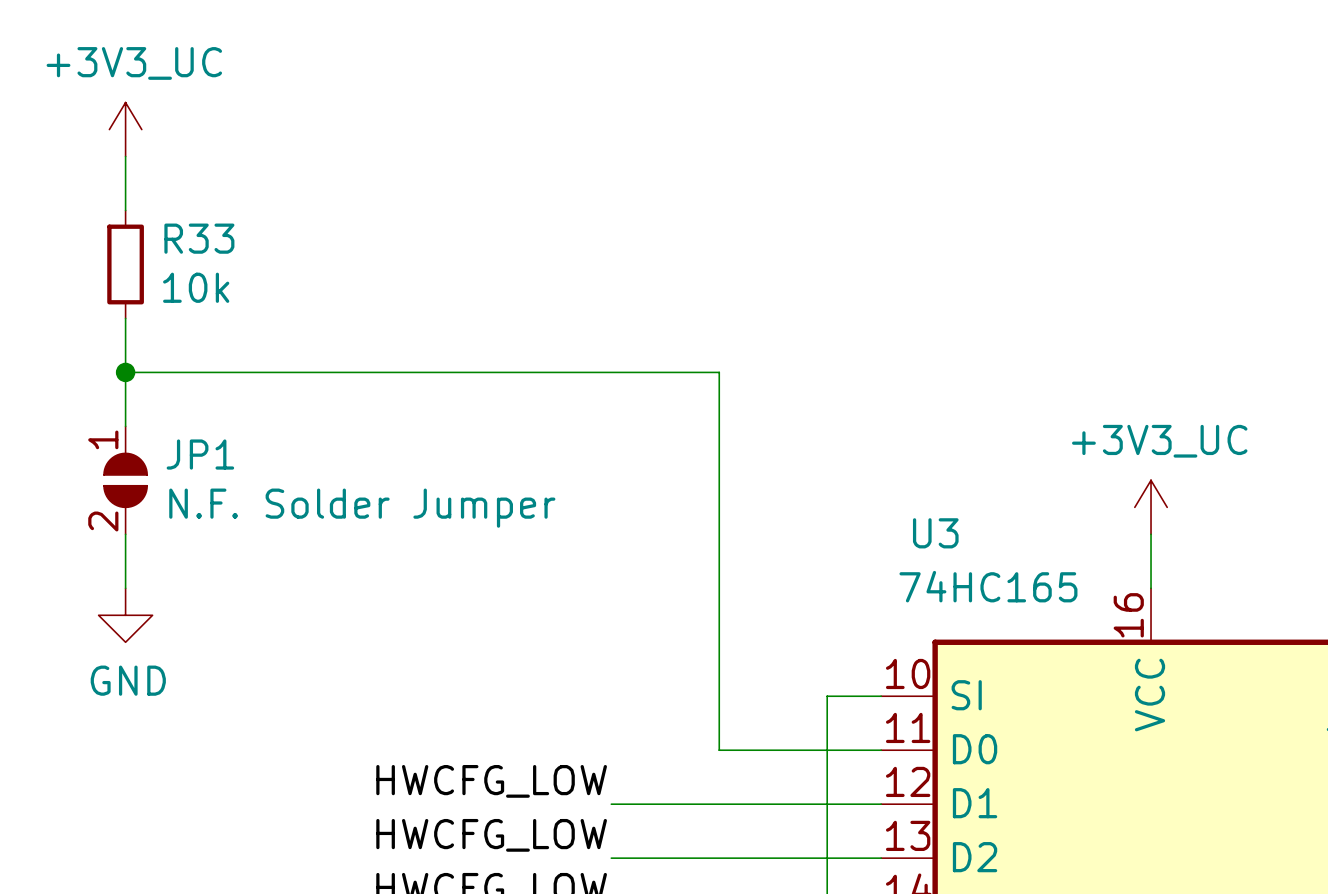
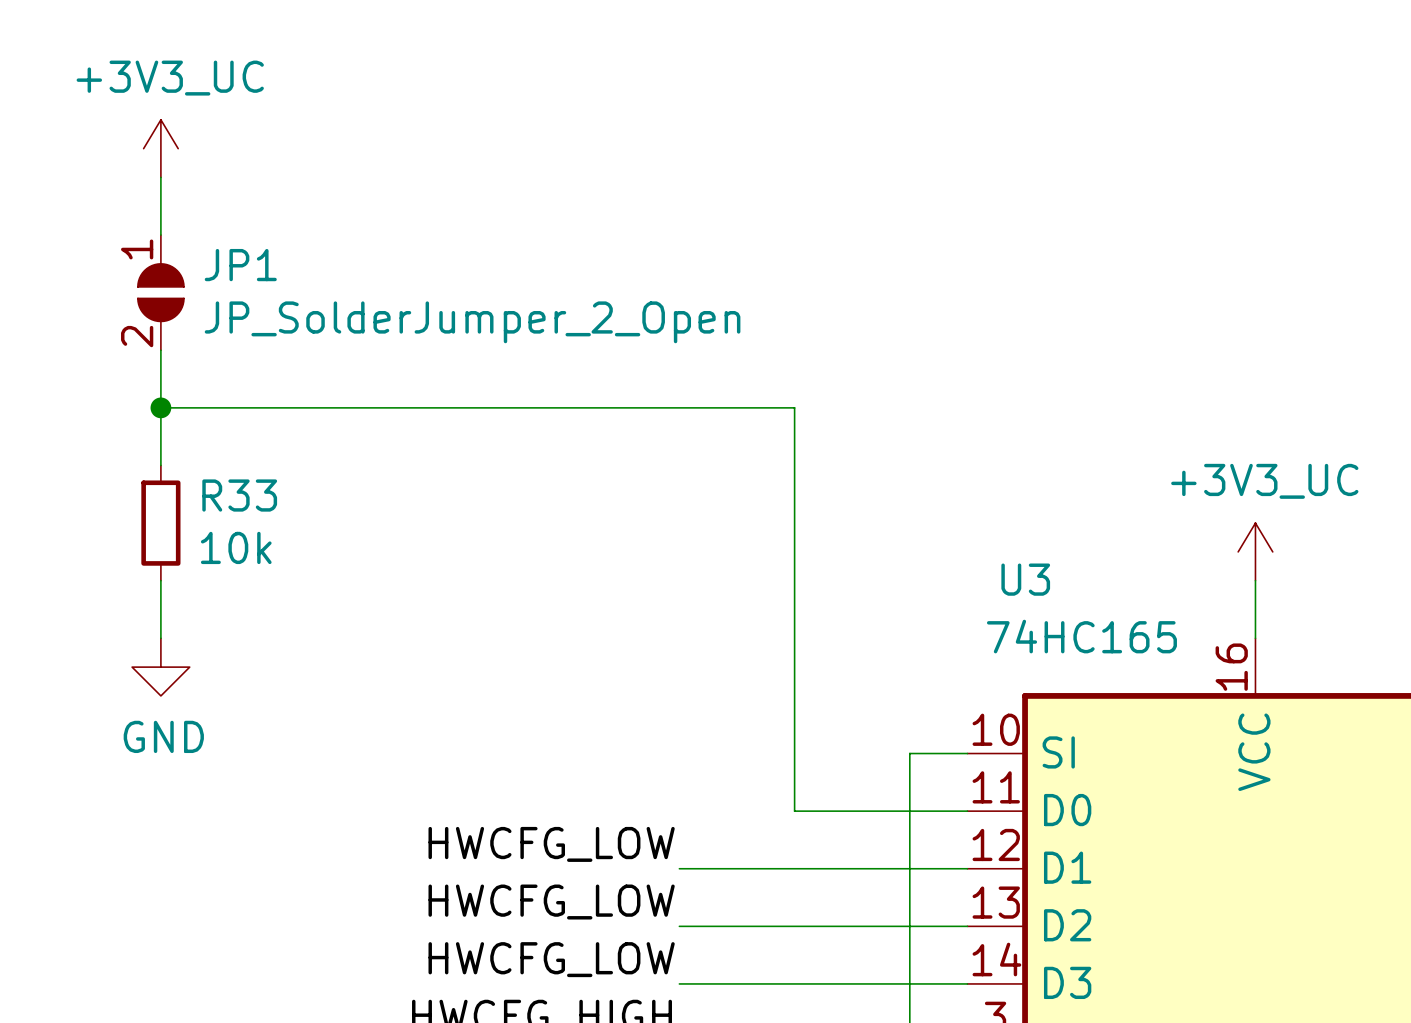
R33 position: (125, 264) -> (160, 523)
JP1 position: (125, 480) -> (160, 292)
JP1 value: N.F. Solder Jumper (362, 508) -> JP_SolderJumper_2_Open (472, 322)

